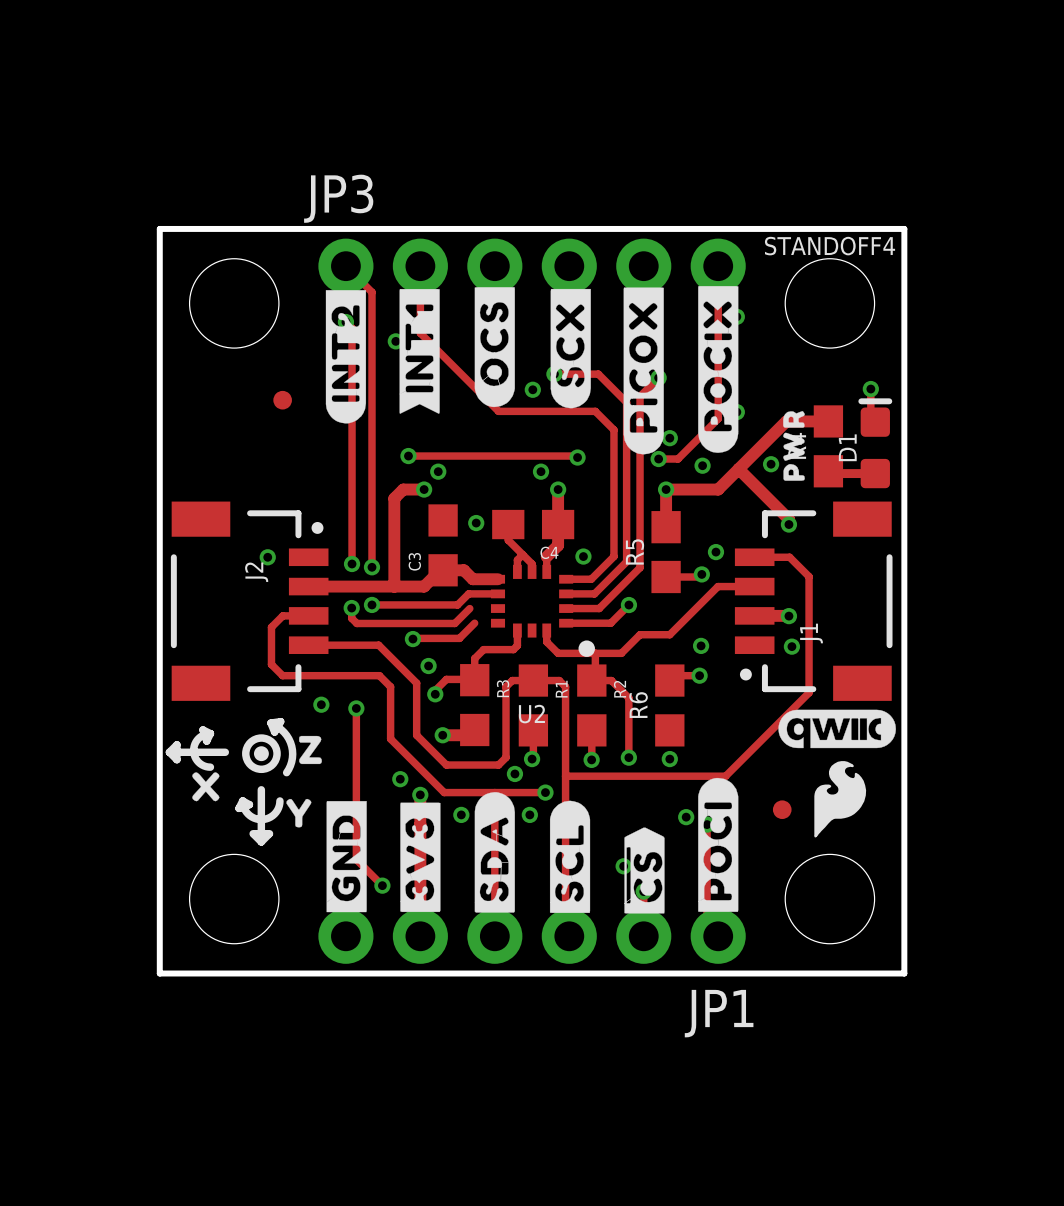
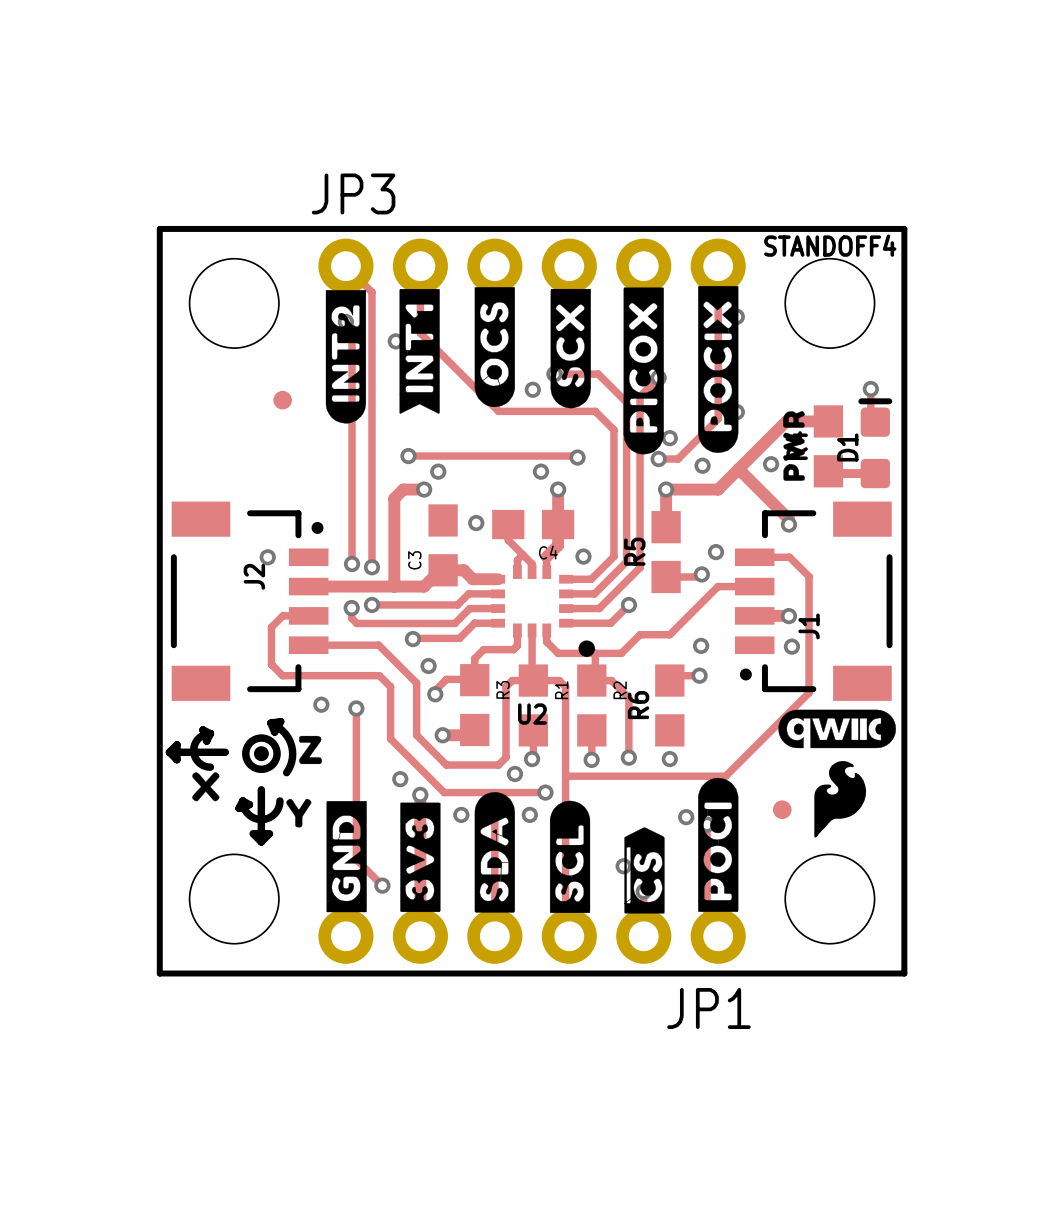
track: none -> (469, 608) (497, 608)
track: none -> (474, 623) (497, 623)
track: none -> (532, 630) (533, 680)

